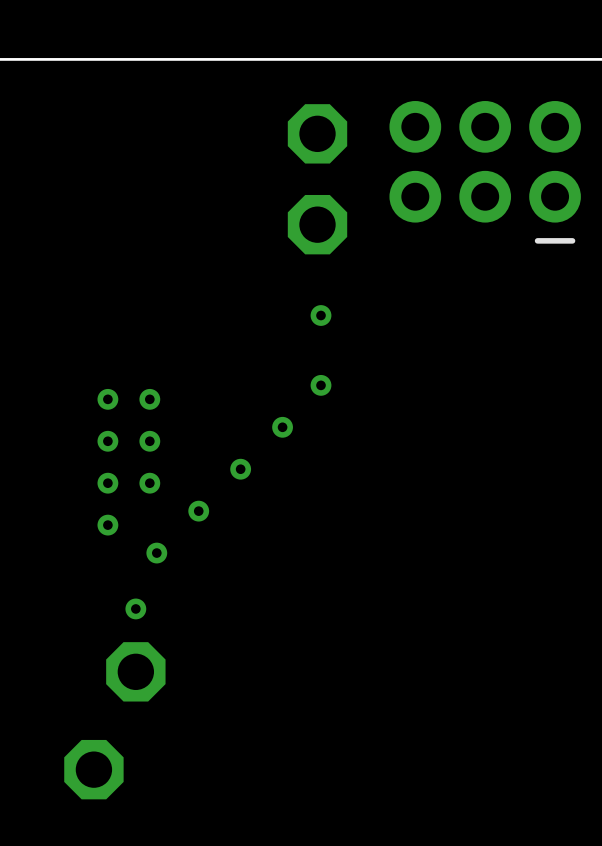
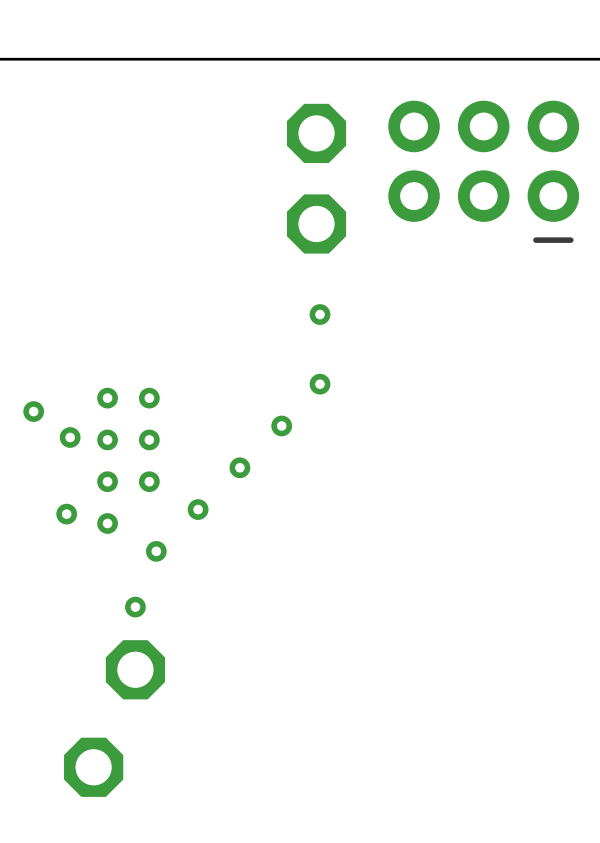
via: none -> (33, 411)
via: none -> (70, 437)
via: none -> (66, 514)

